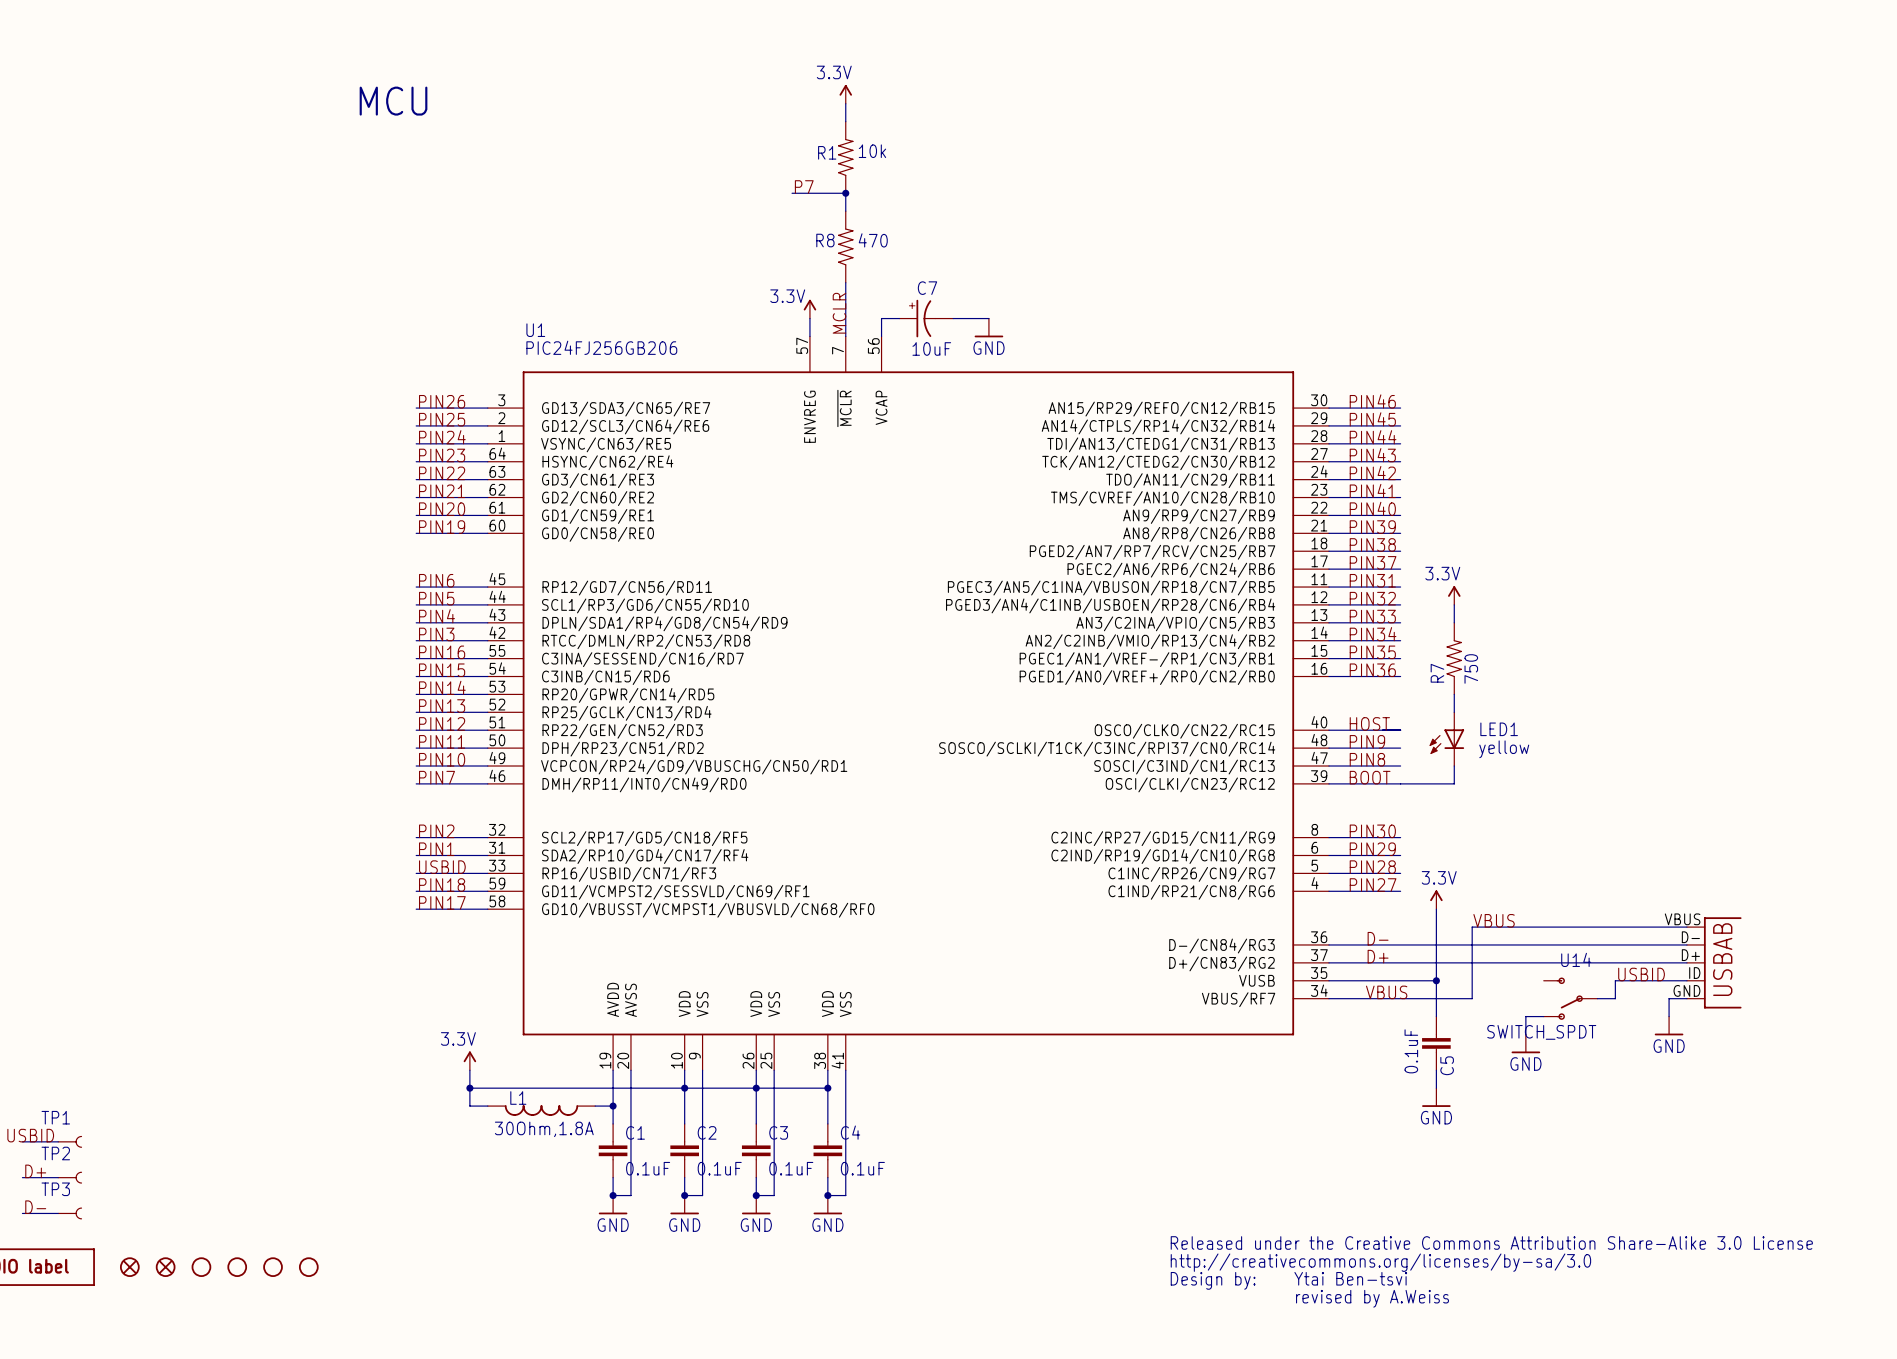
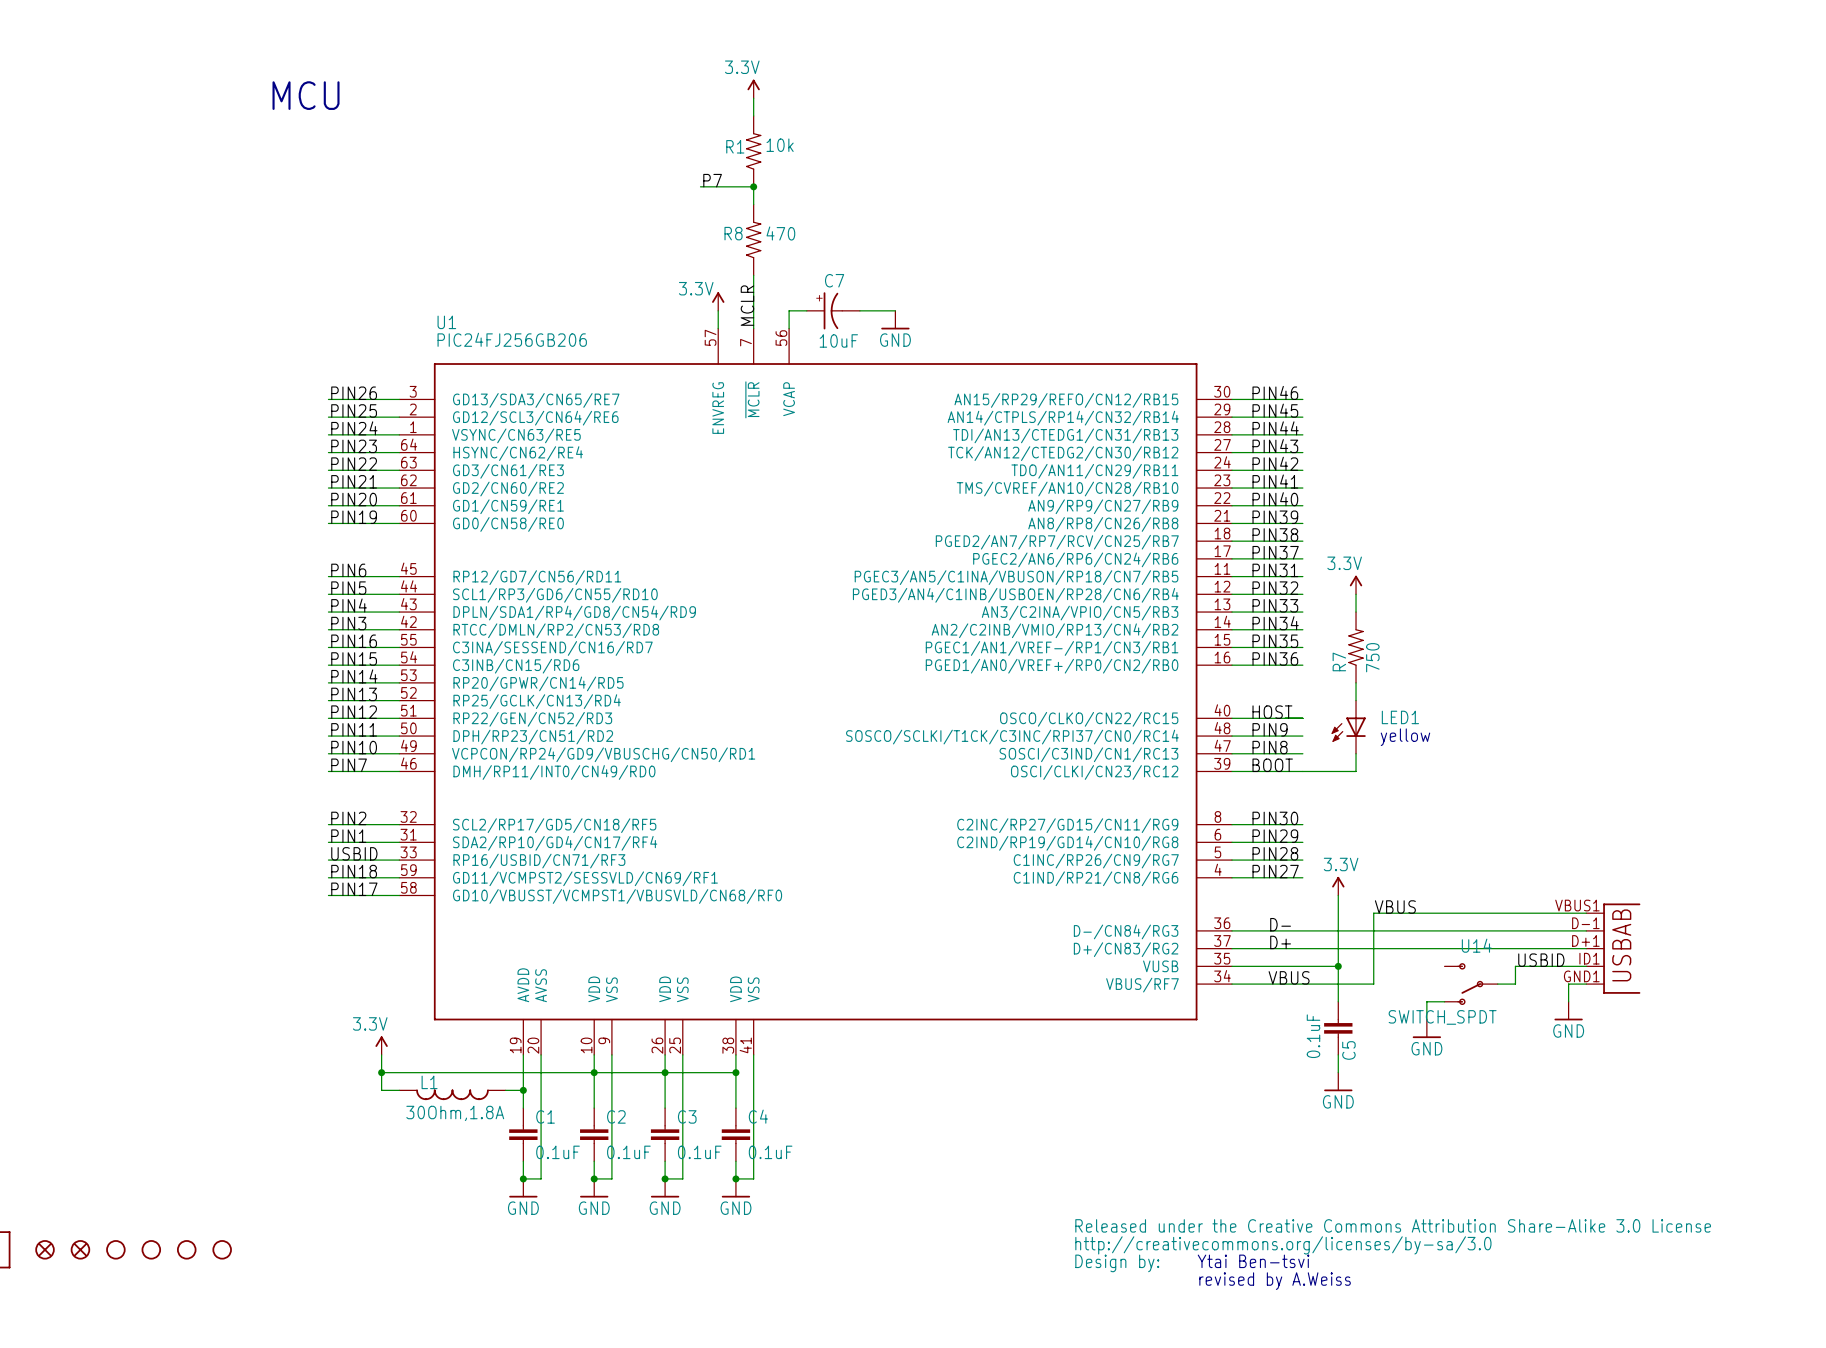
part pin number: VBUS (1682, 919) -> VBUS1 (1577, 905)
part pin number: D- (1690, 937) -> D-1 (1585, 923)
part pin number: D+ (1690, 955) -> D+1 (1585, 940)
part pin number: ID (1694, 973) -> ID1 (1589, 958)
part pin number: GND (1686, 990) -> GND1 (1581, 976)

